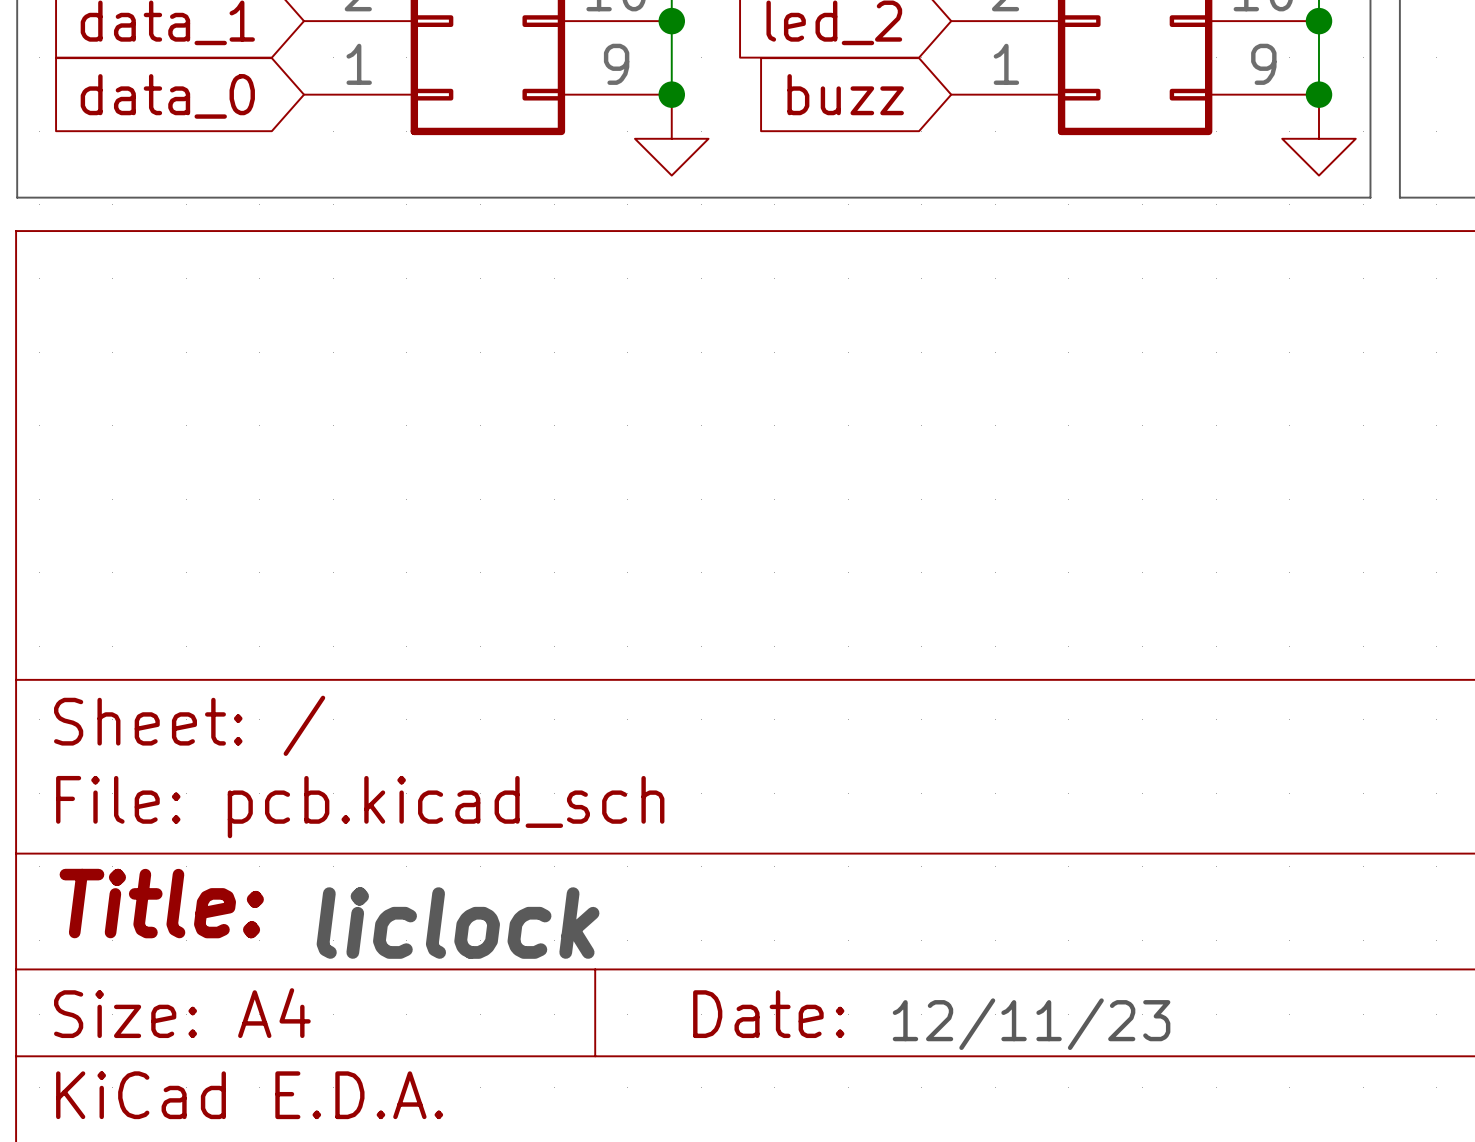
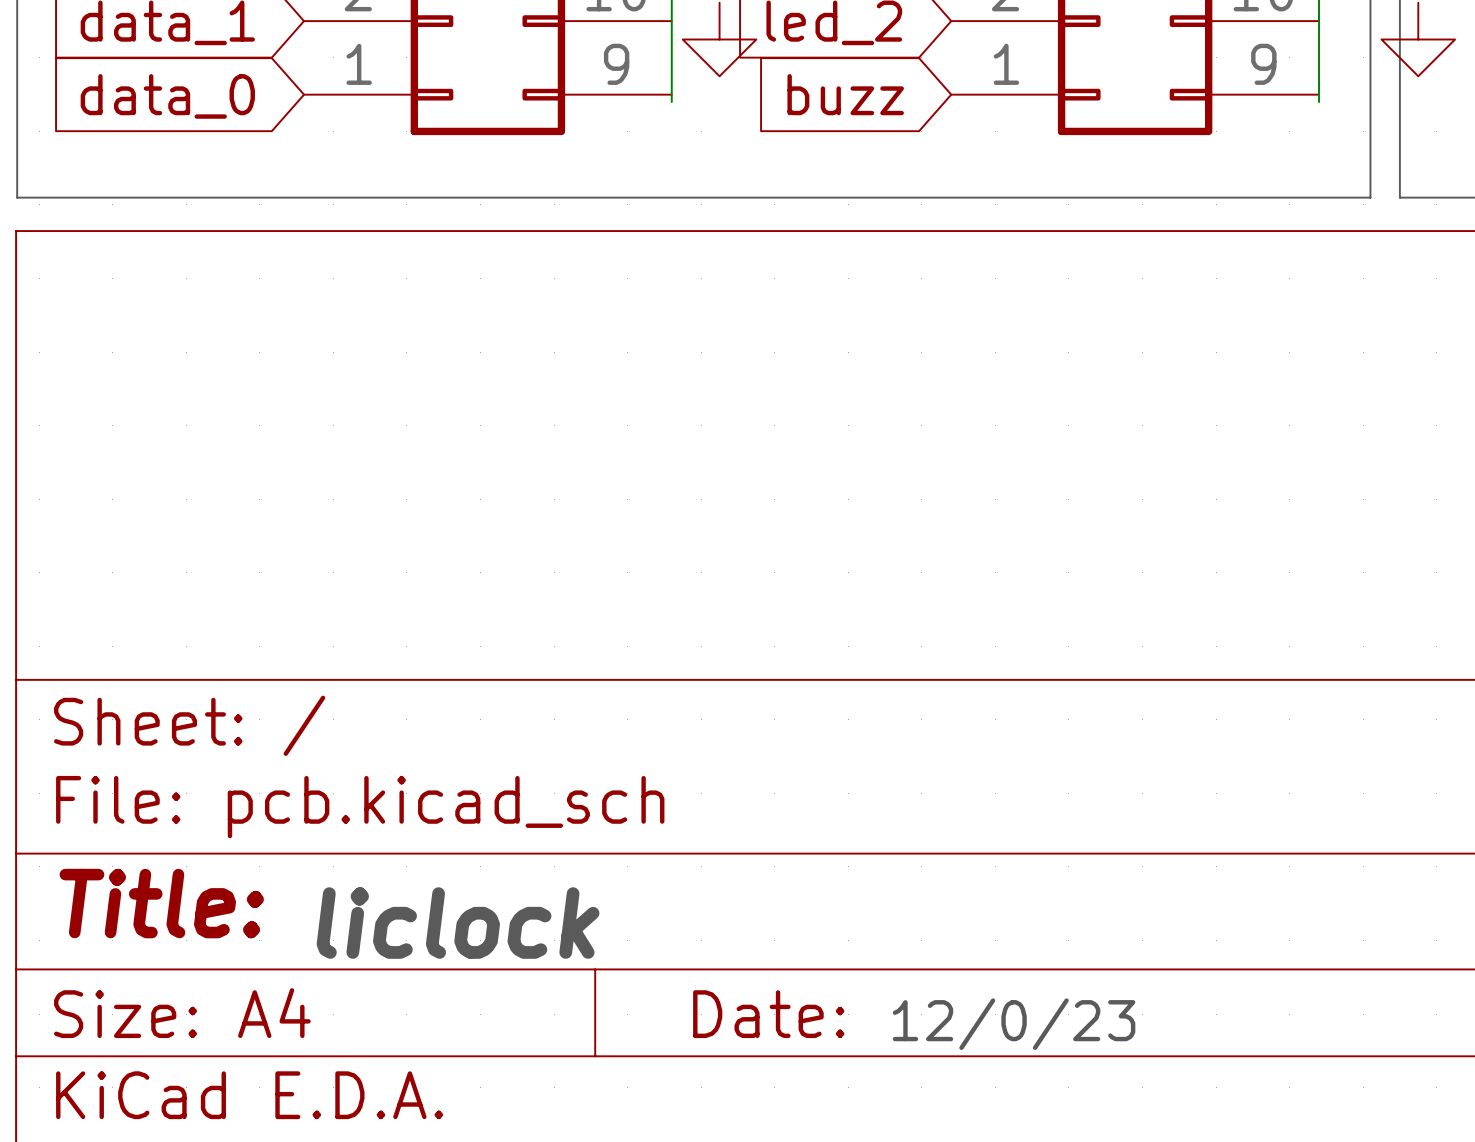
junction: (671, 21) -> none
junction: (1318, 21) -> none
junction: (671, 94) -> none
junction: (1318, 94) -> none
power symbol position: (671, 138) -> (719, 39)
power symbol position: (1318, 138) -> (1418, 39)
text: 12/11/23 (1031, 1024) -> 12/0/23 (1014, 1024)

